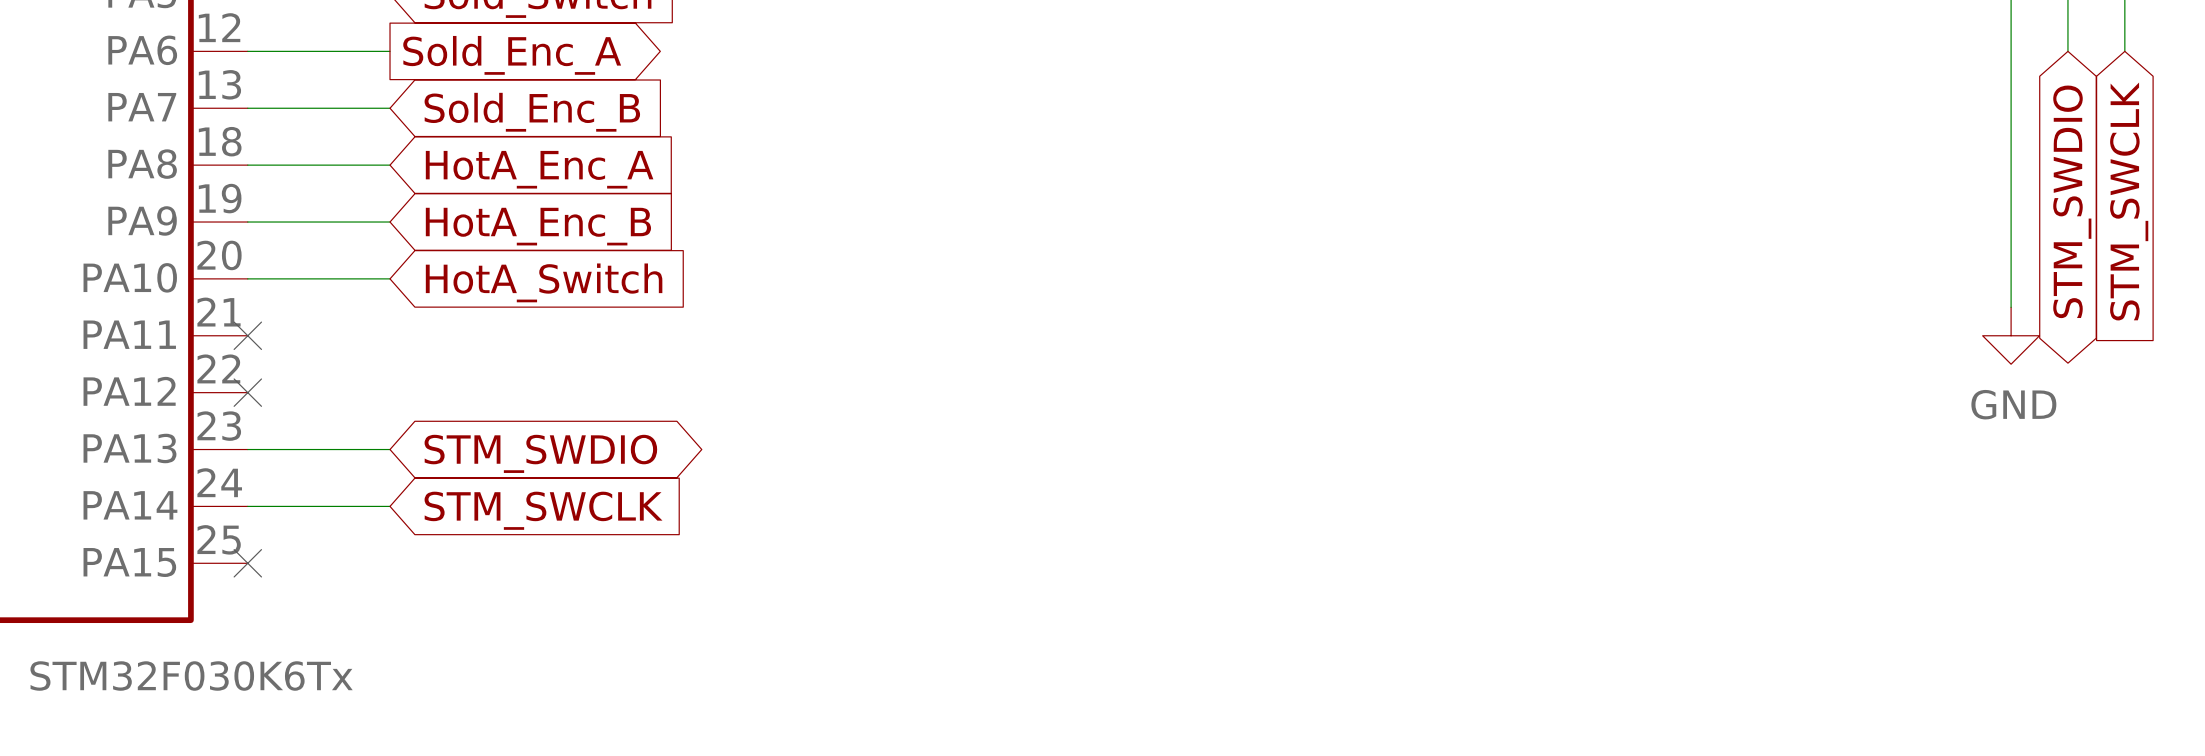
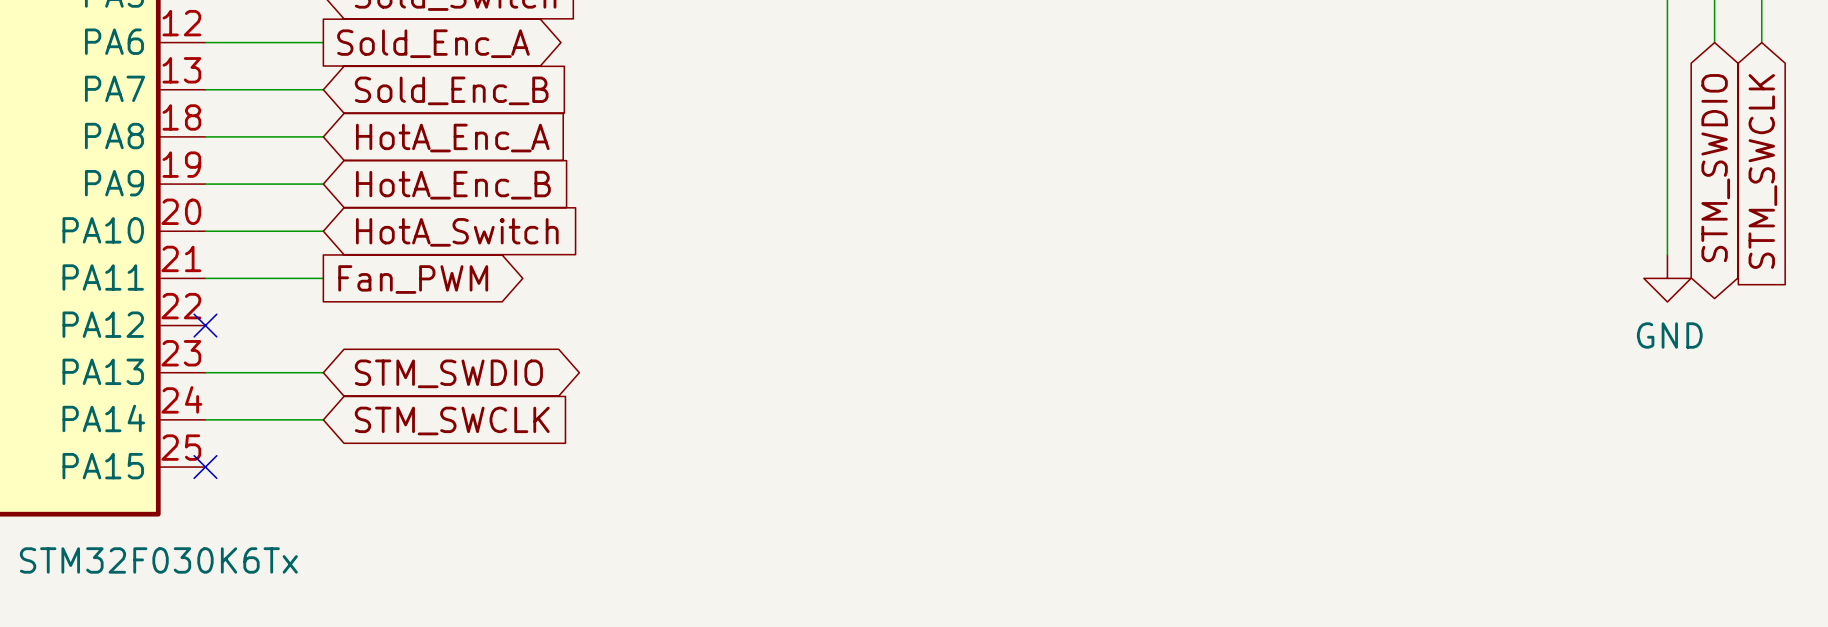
wire: none -> (205, 278) (323, 278)
no-connect mark: (247, 335) -> none
global label: none -> Fan_PWM (413, 279)

